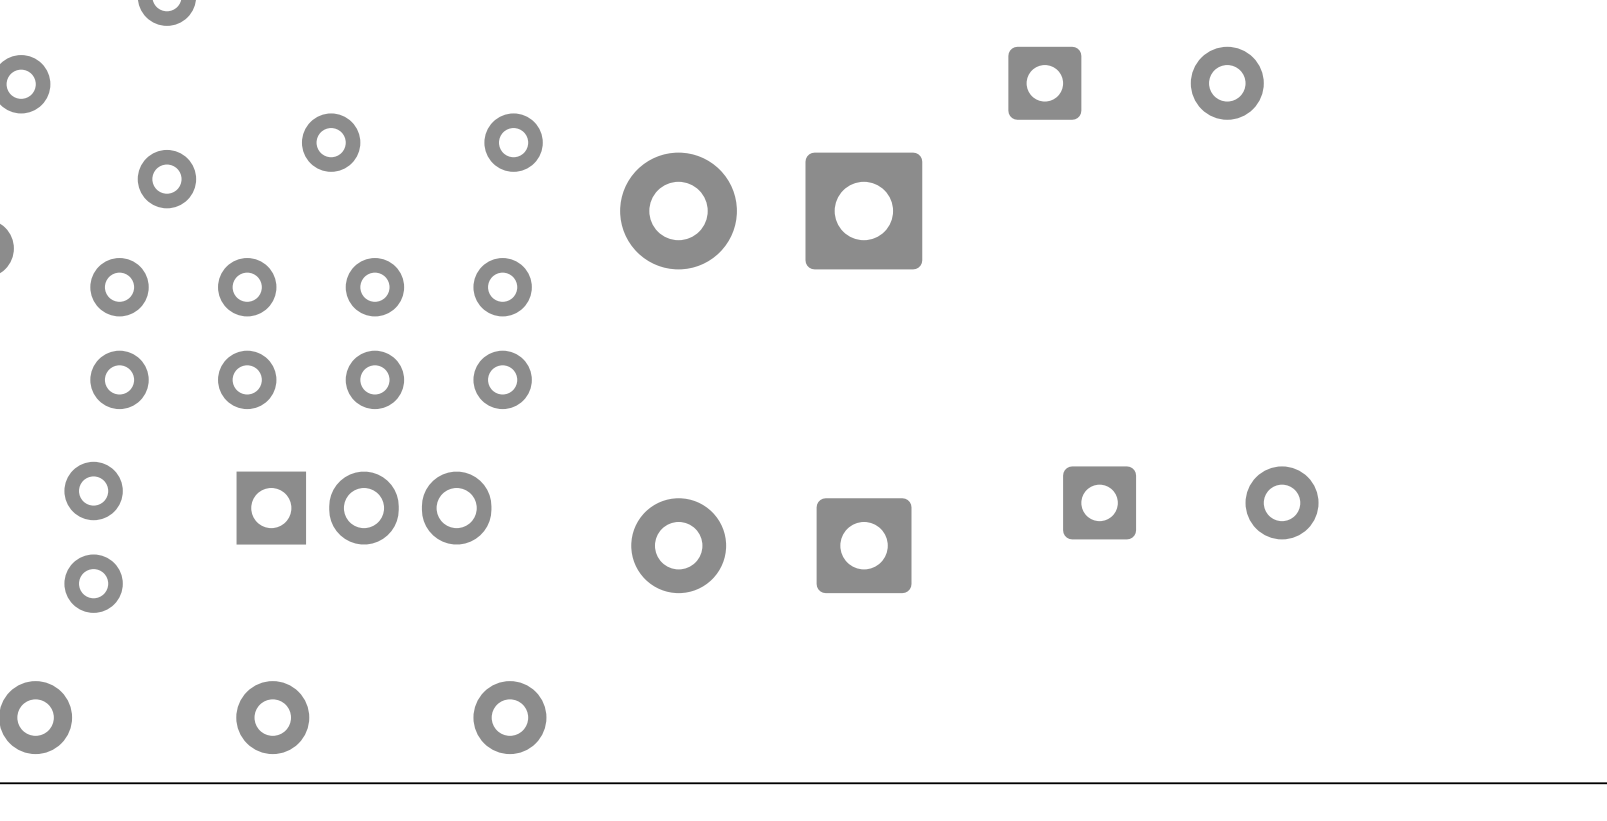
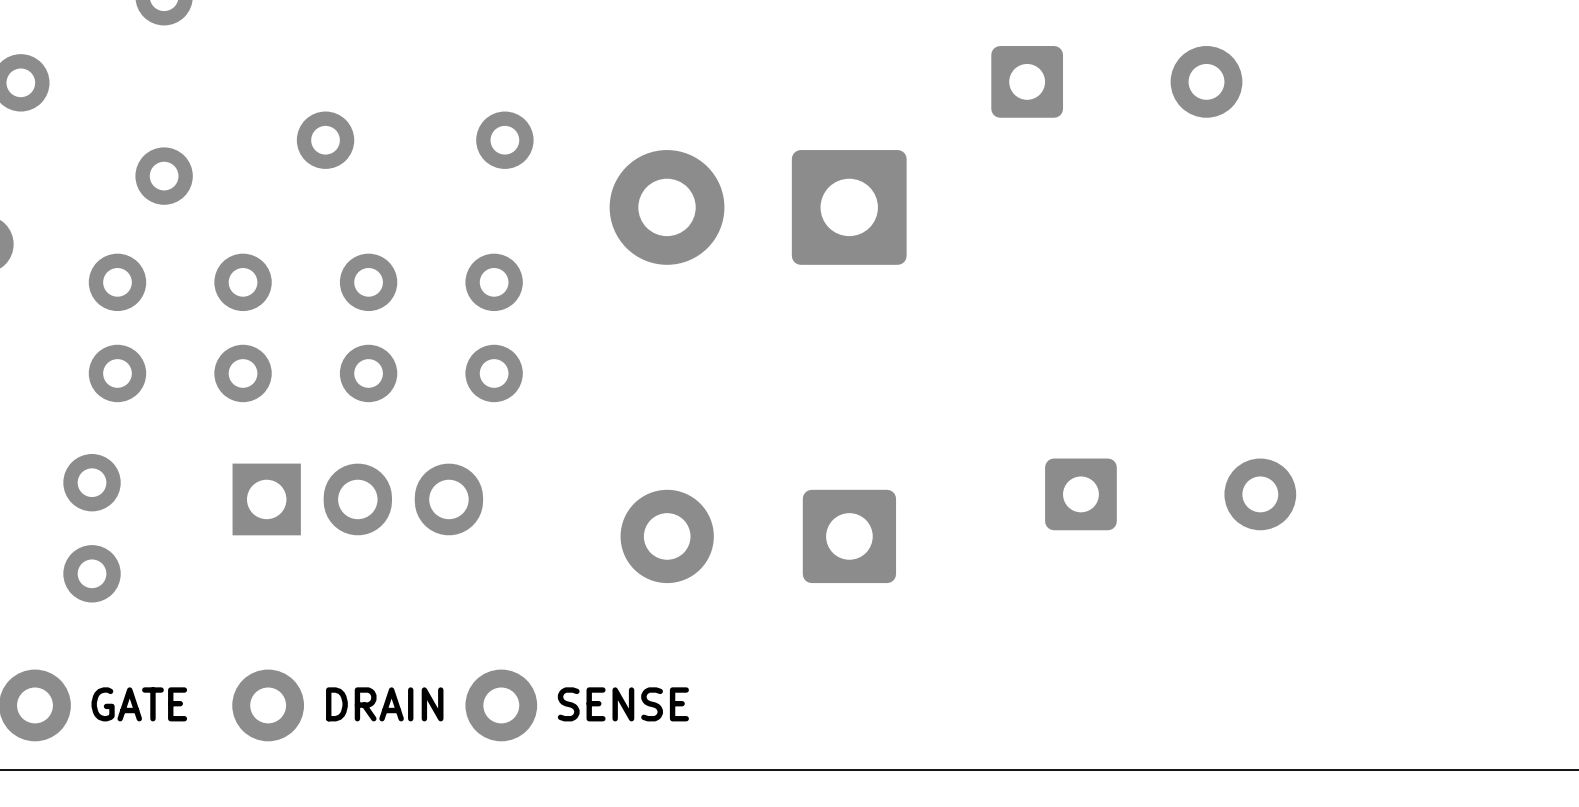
text: none -> GATE (139, 704)
text: none -> DRAIN (384, 704)
text: none -> SENSE (623, 704)

